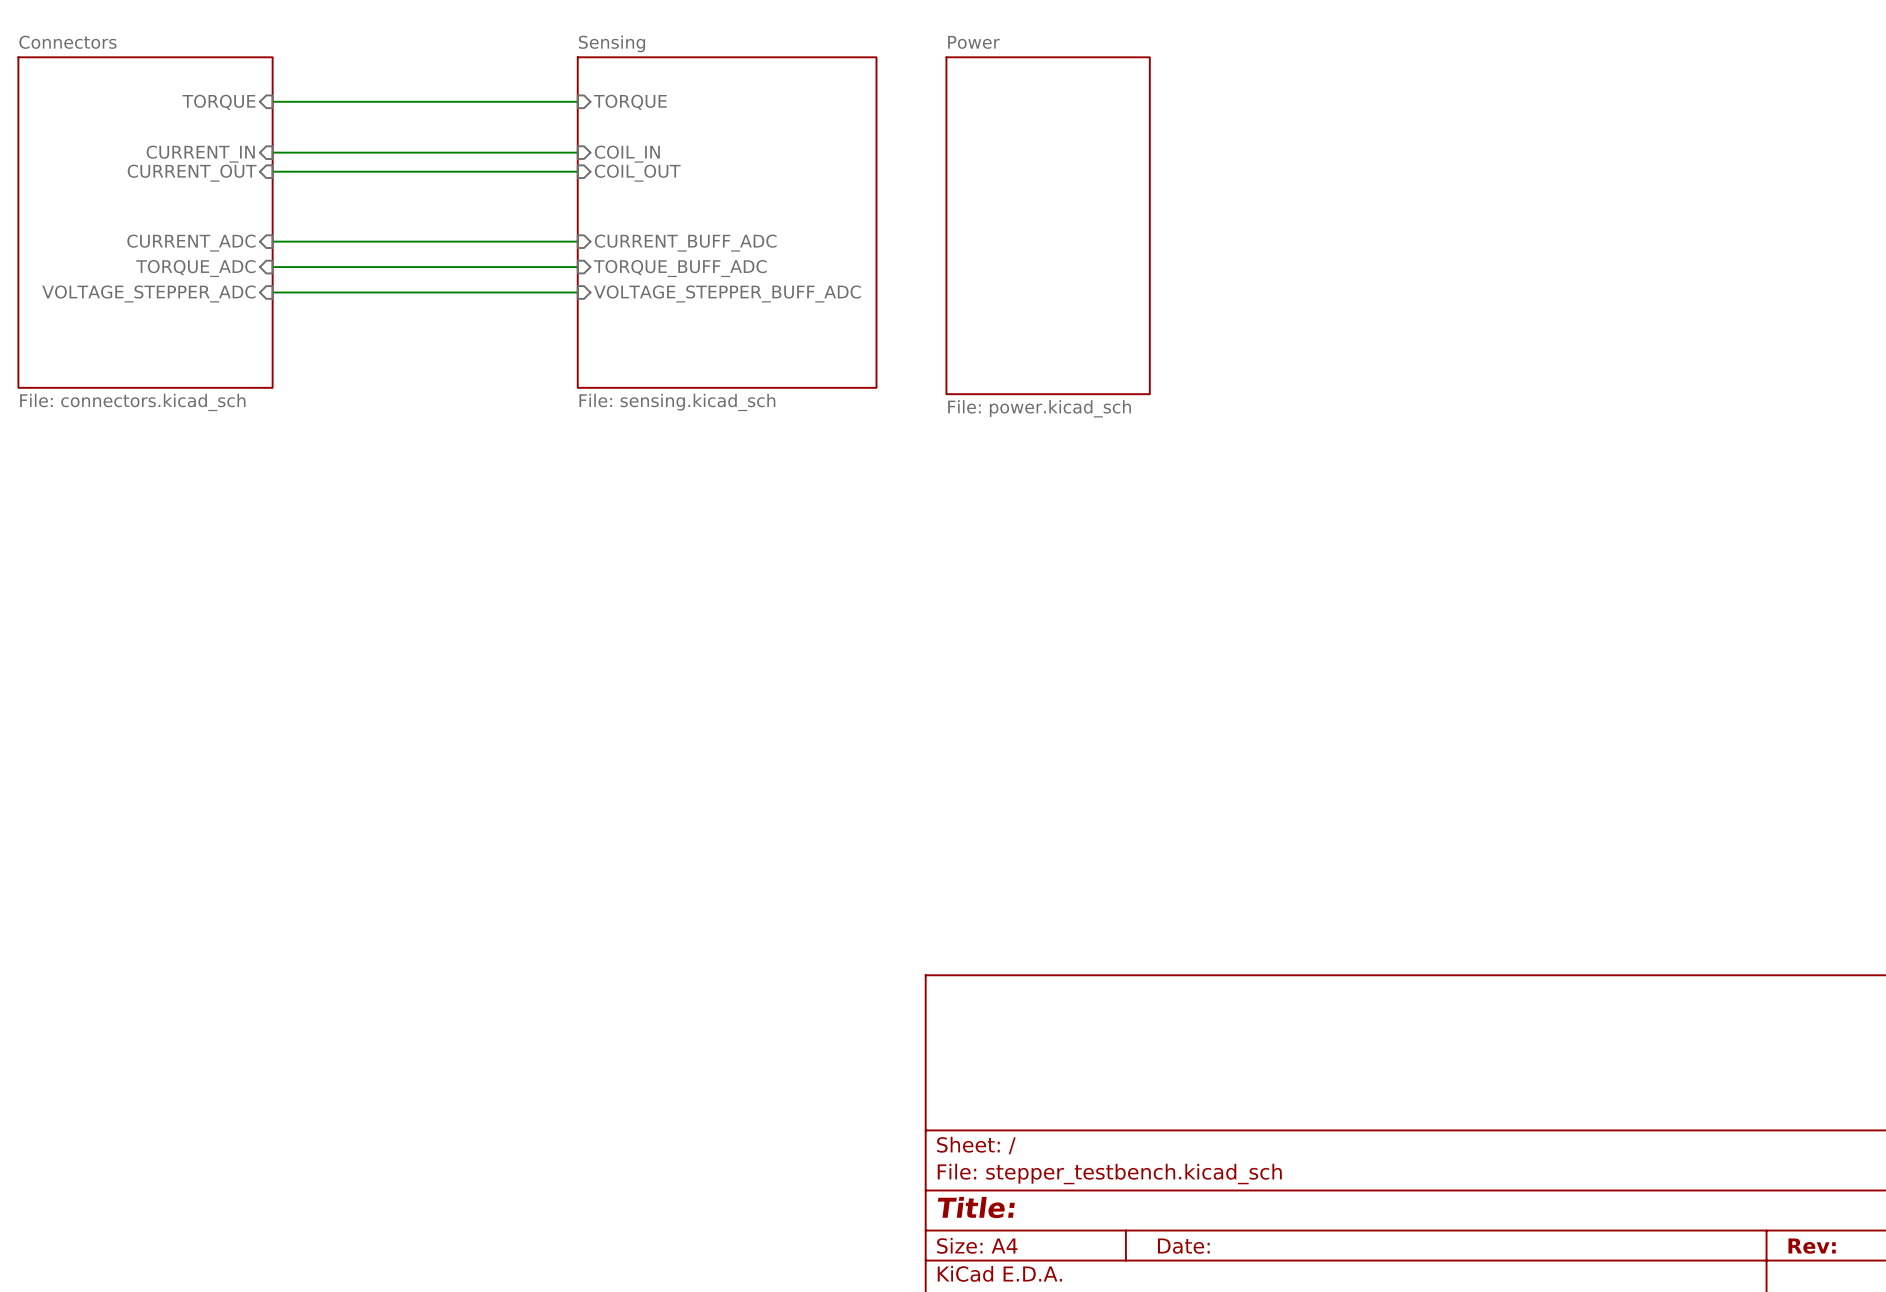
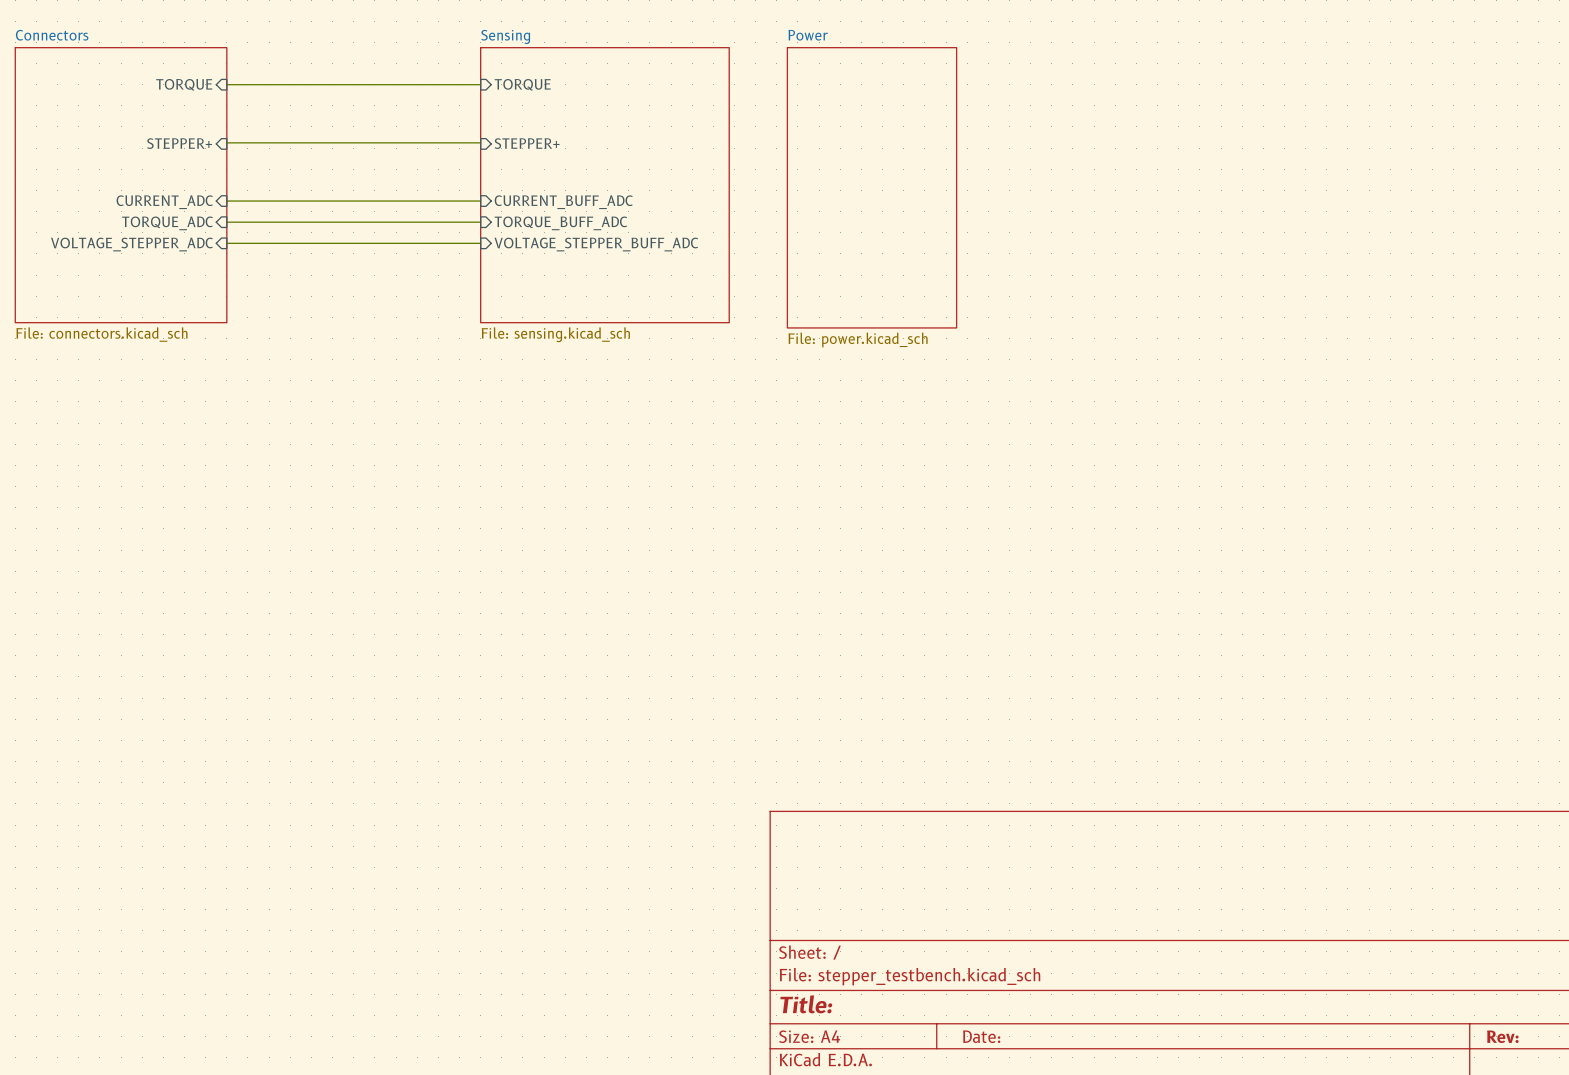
wire: (272, 152) (577, 152) -> none
sheet pin: CURRENT_IN (200, 154) -> none
sheet pin: COIL_IN (627, 154) -> none
sheet pin: CURRENT_OUT (192, 173) -> STEPPER+ (179, 143)
sheet pin: COIL_OUT (637, 173) -> STEPPER+ (527, 143)

